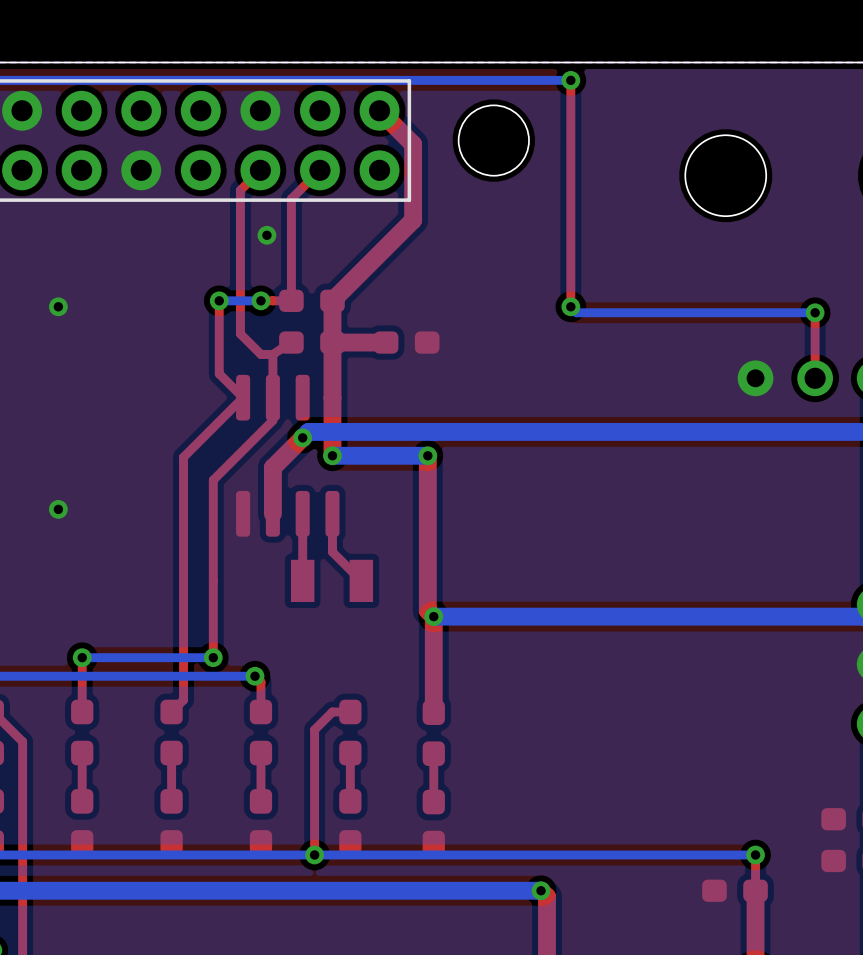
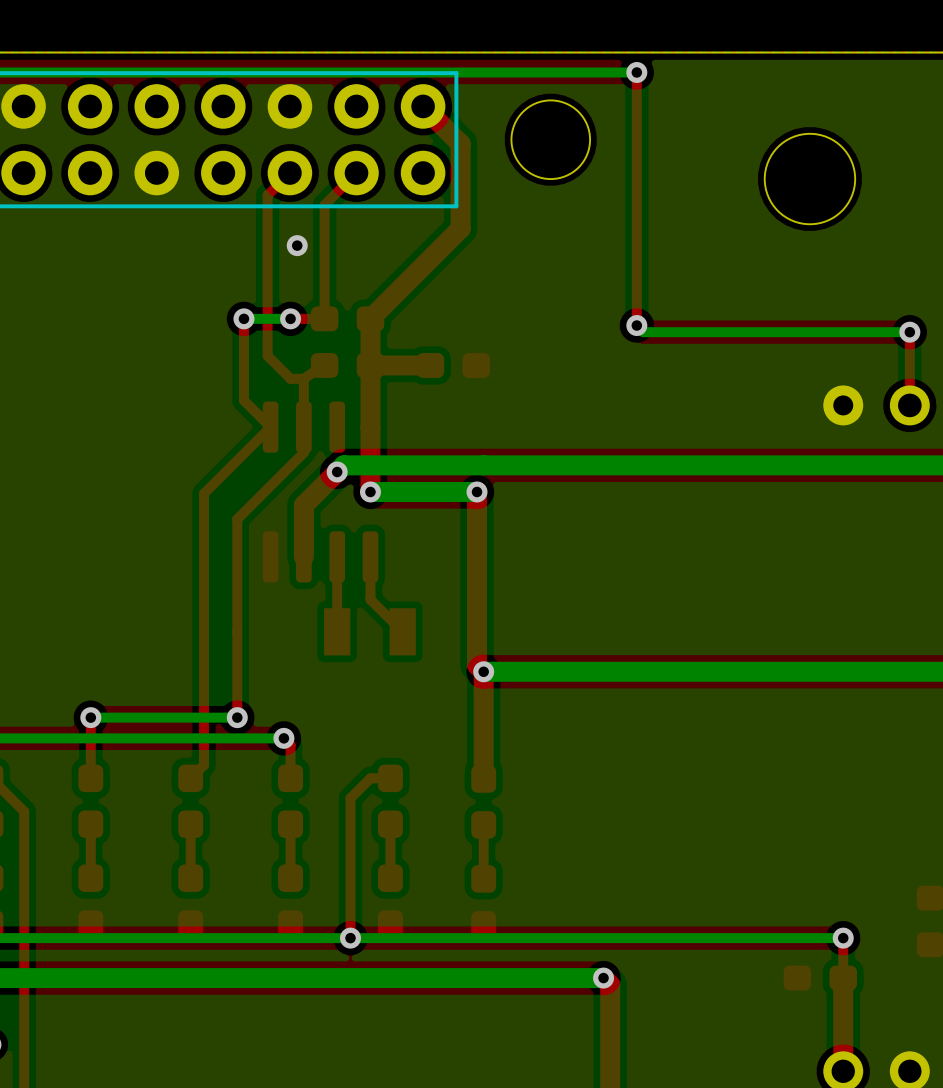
via: (58, 306) -> none
via: (58, 509) -> none

